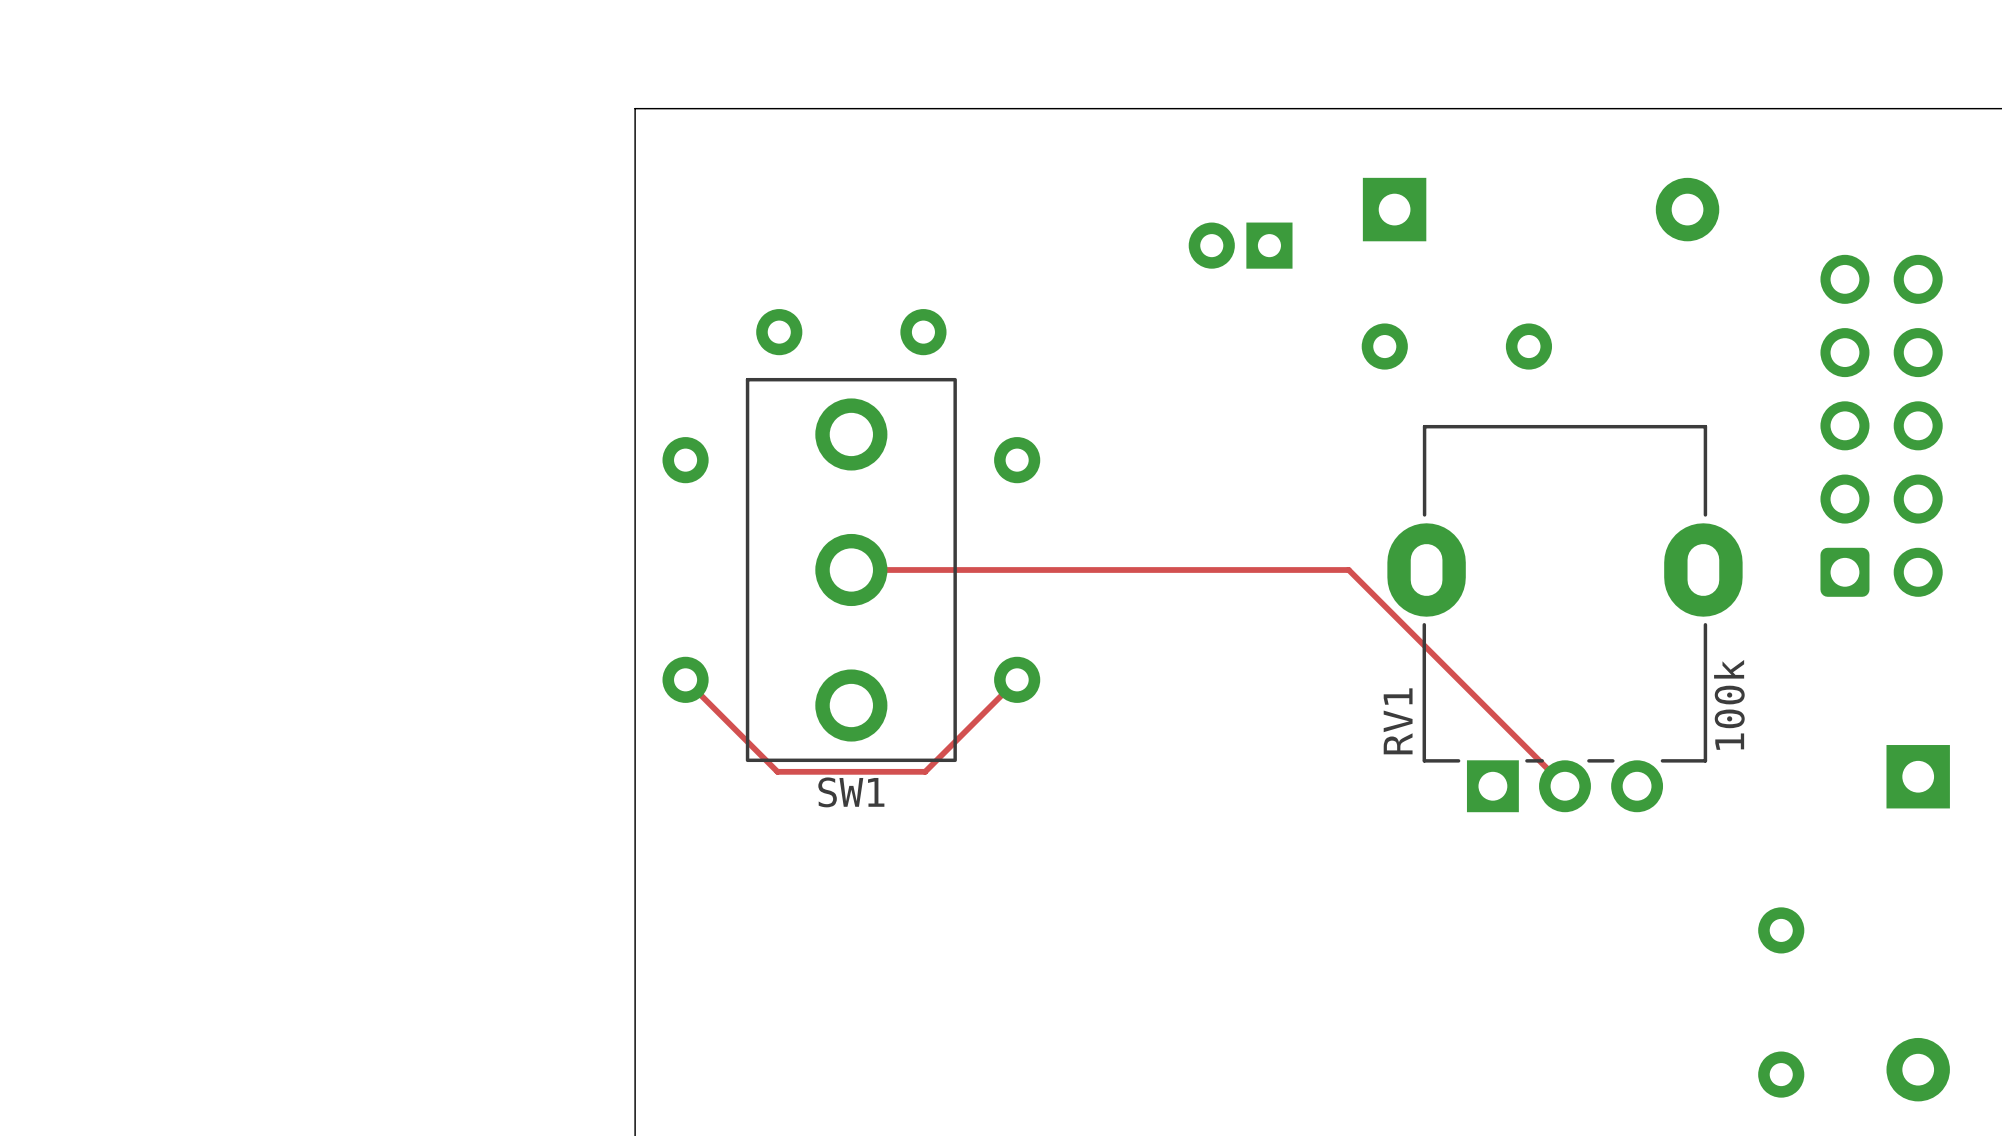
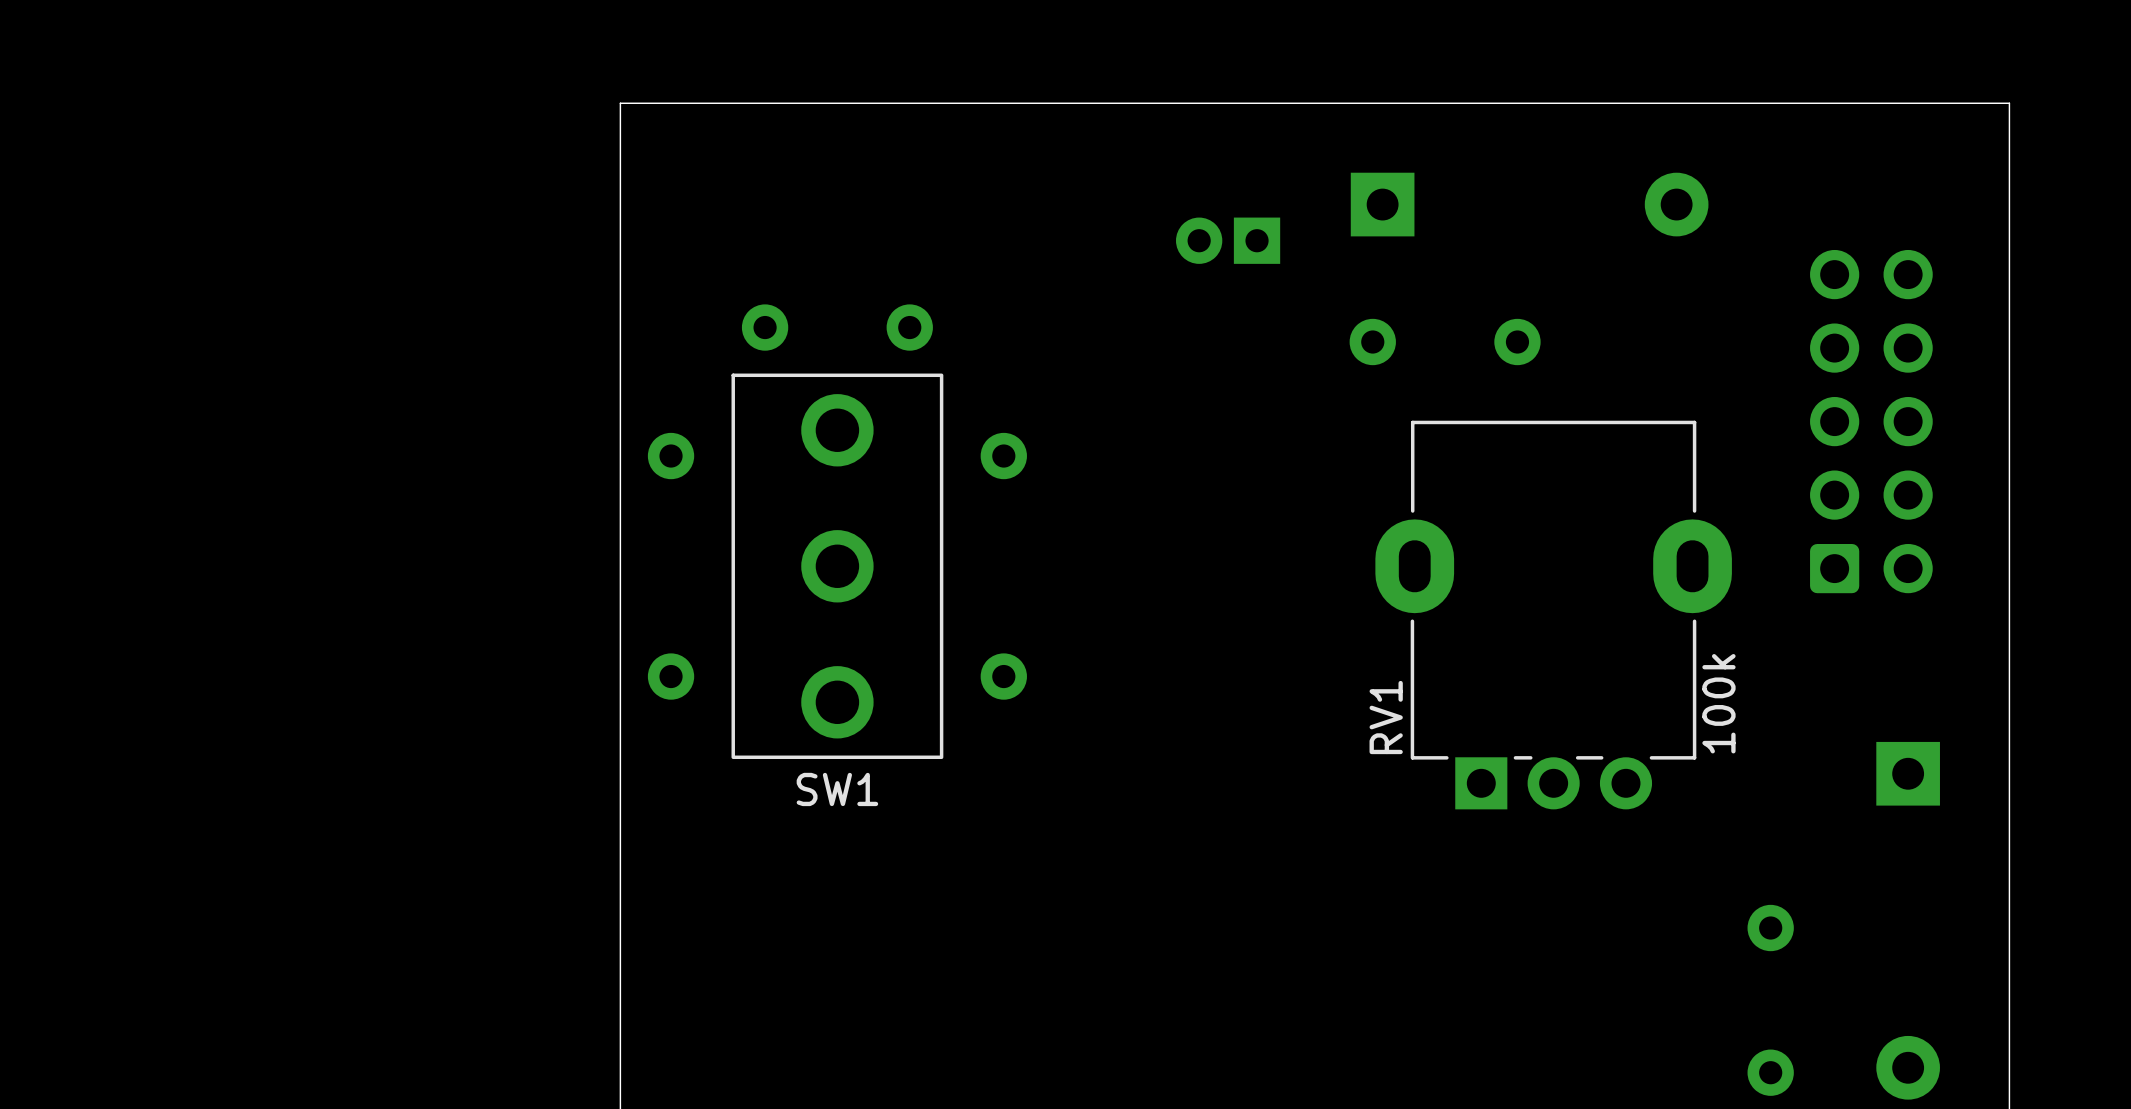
track: (851, 569) (1348, 569) (1564, 786) -> none
track: (685, 679) (777, 771) (925, 771) (1017, 679) -> none

